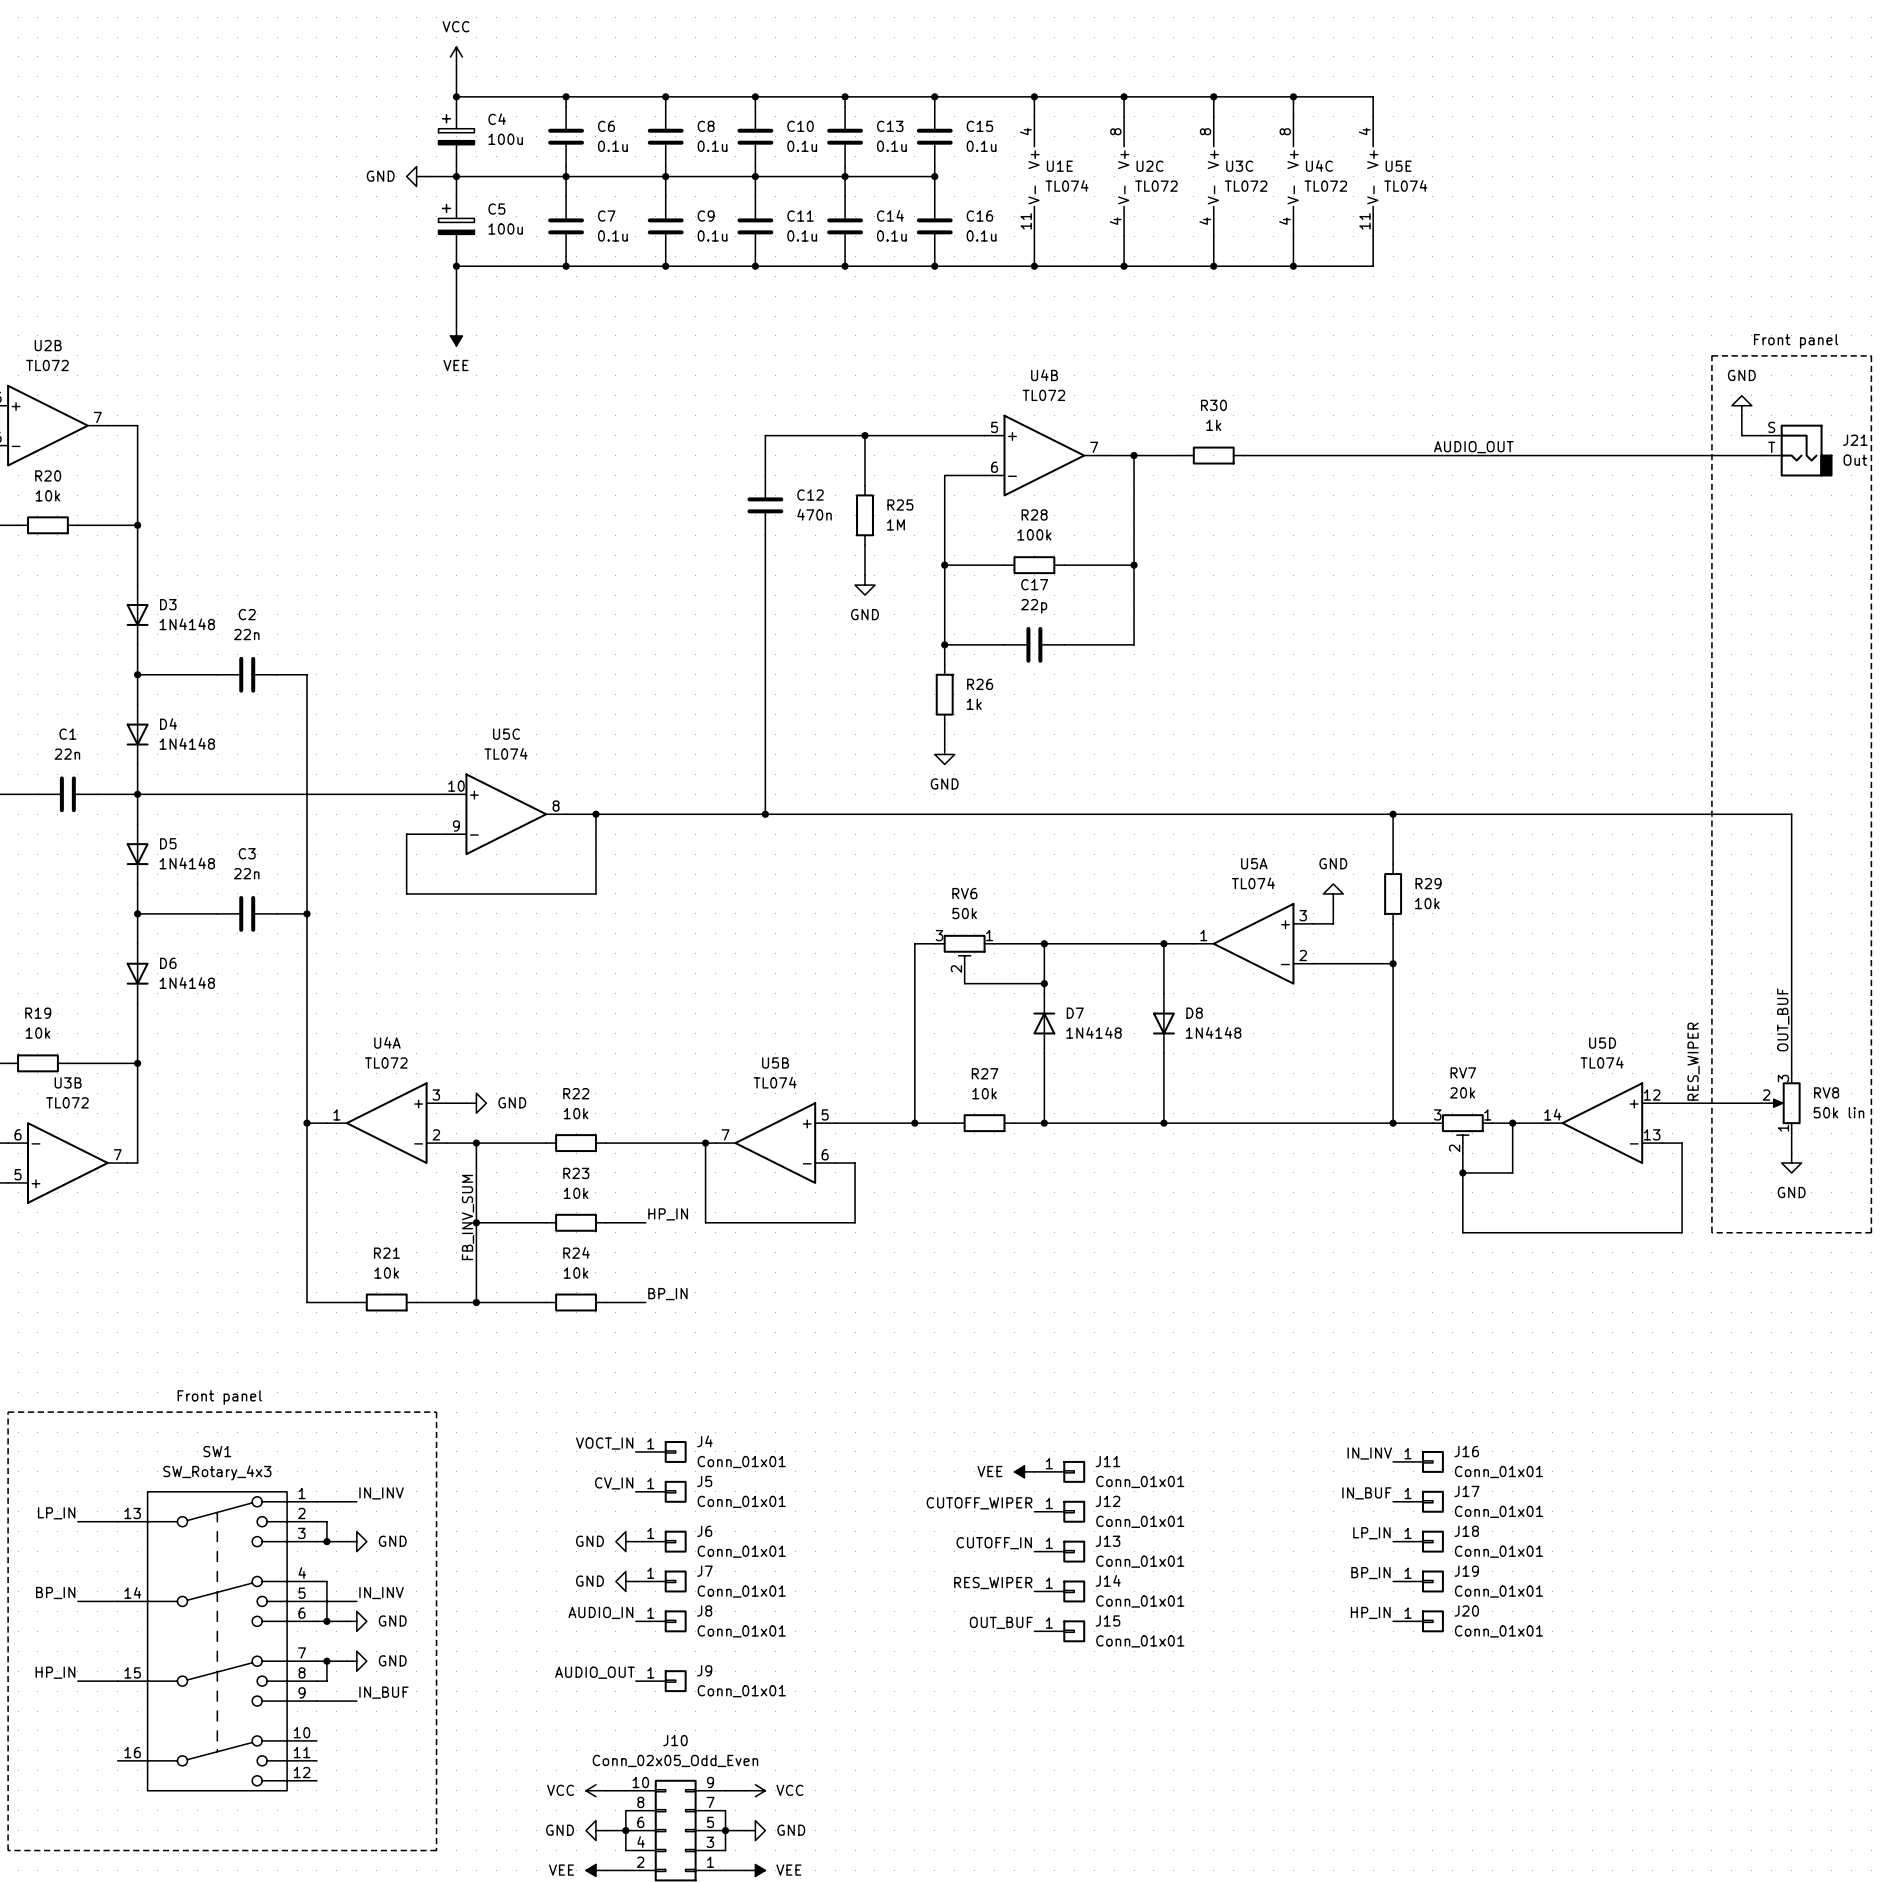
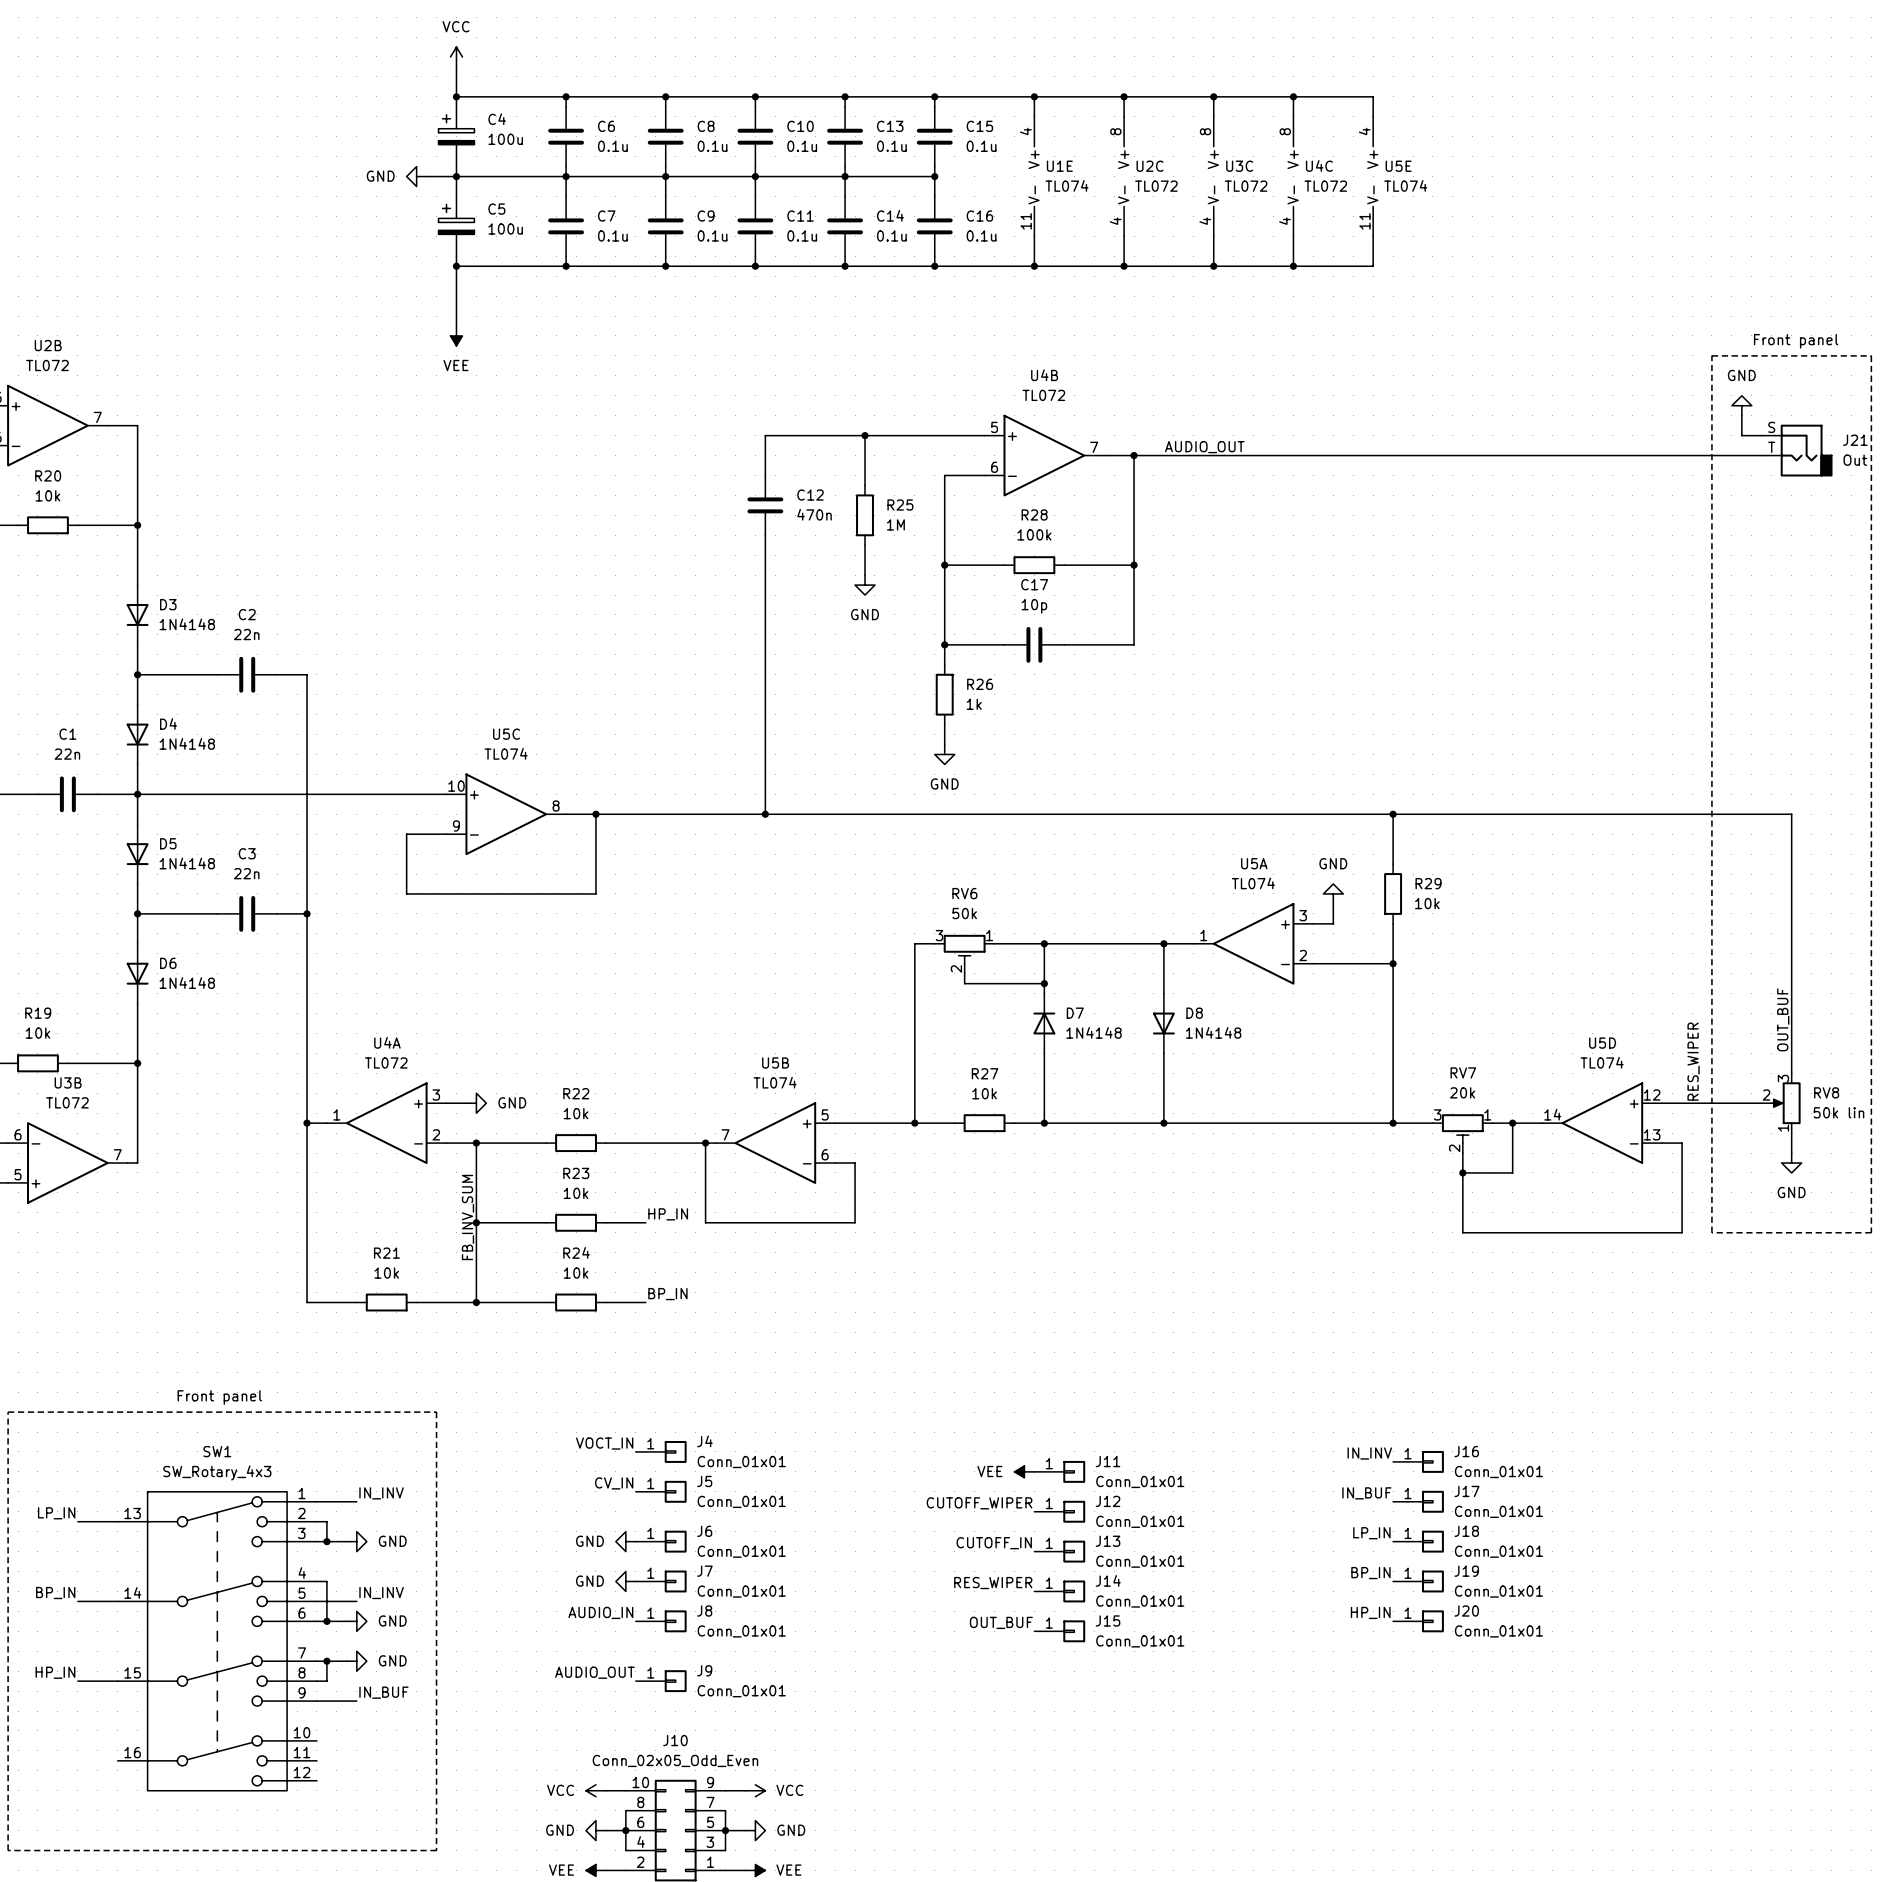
label: none -> AUDIO_OUT (1204, 447)
label: AUDIO_OUT (1473, 447) -> none
wire: none -> (1183, 455) (1243, 455)
R30: 1k (1213, 455) -> none
C17 value: 22p (1034, 606) -> 10p (1034, 606)

